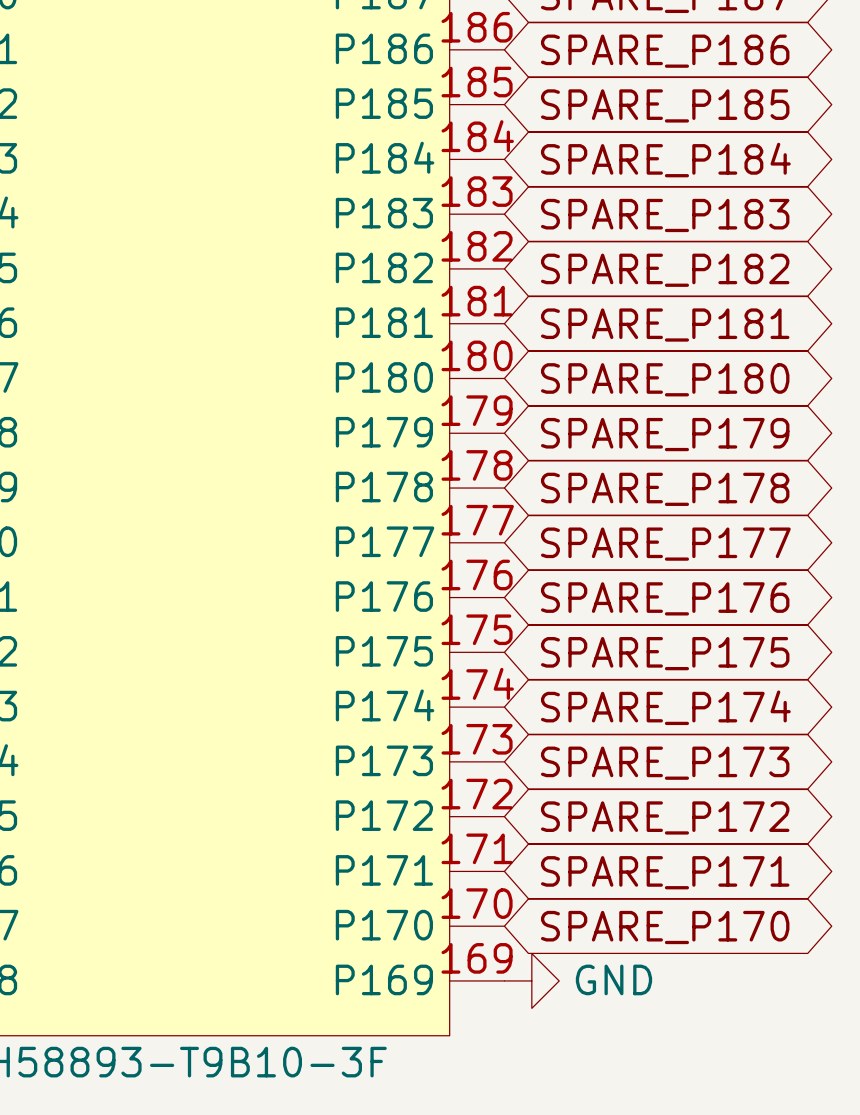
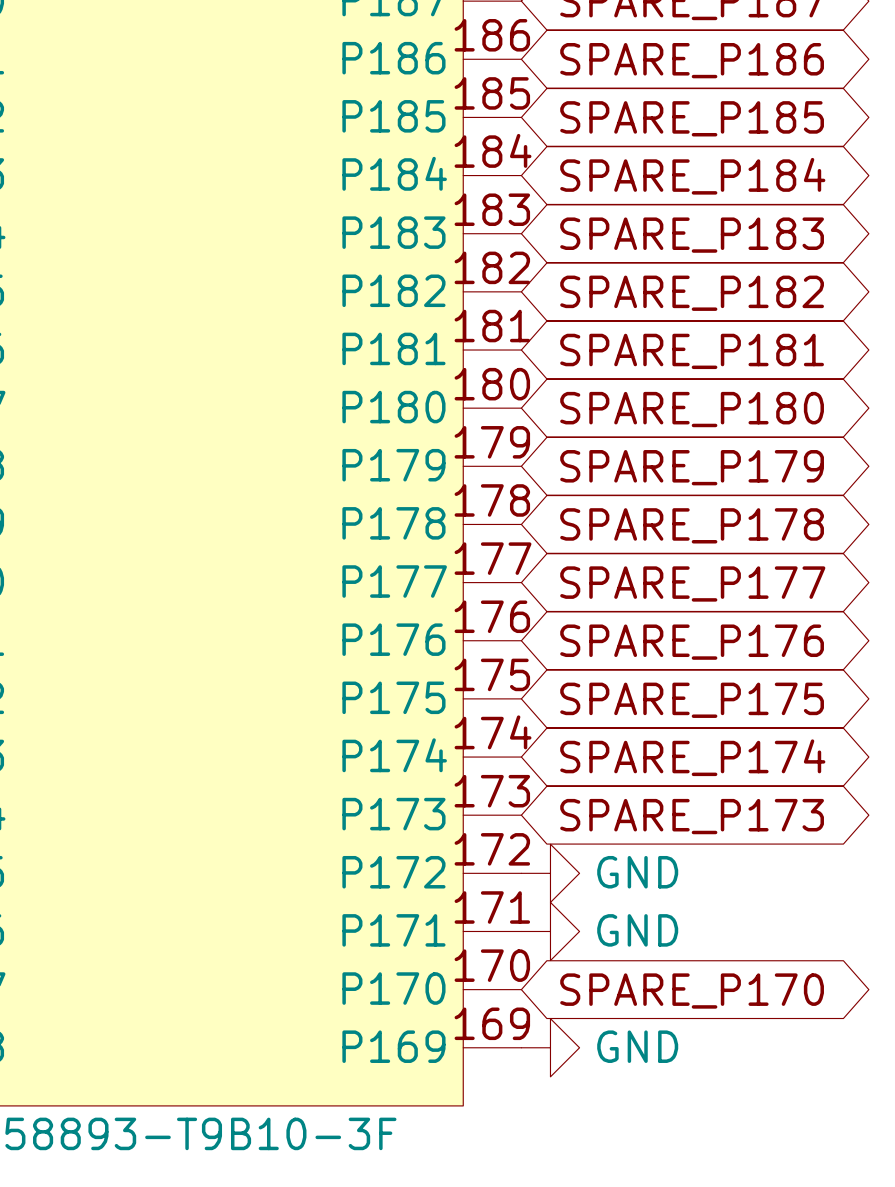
power symbol: none -> GND (550, 873)
global label: SPARE_P172 (665, 817) -> none
power symbol: none -> GND (550, 931)
global label: SPARE_P171 (665, 872) -> none

